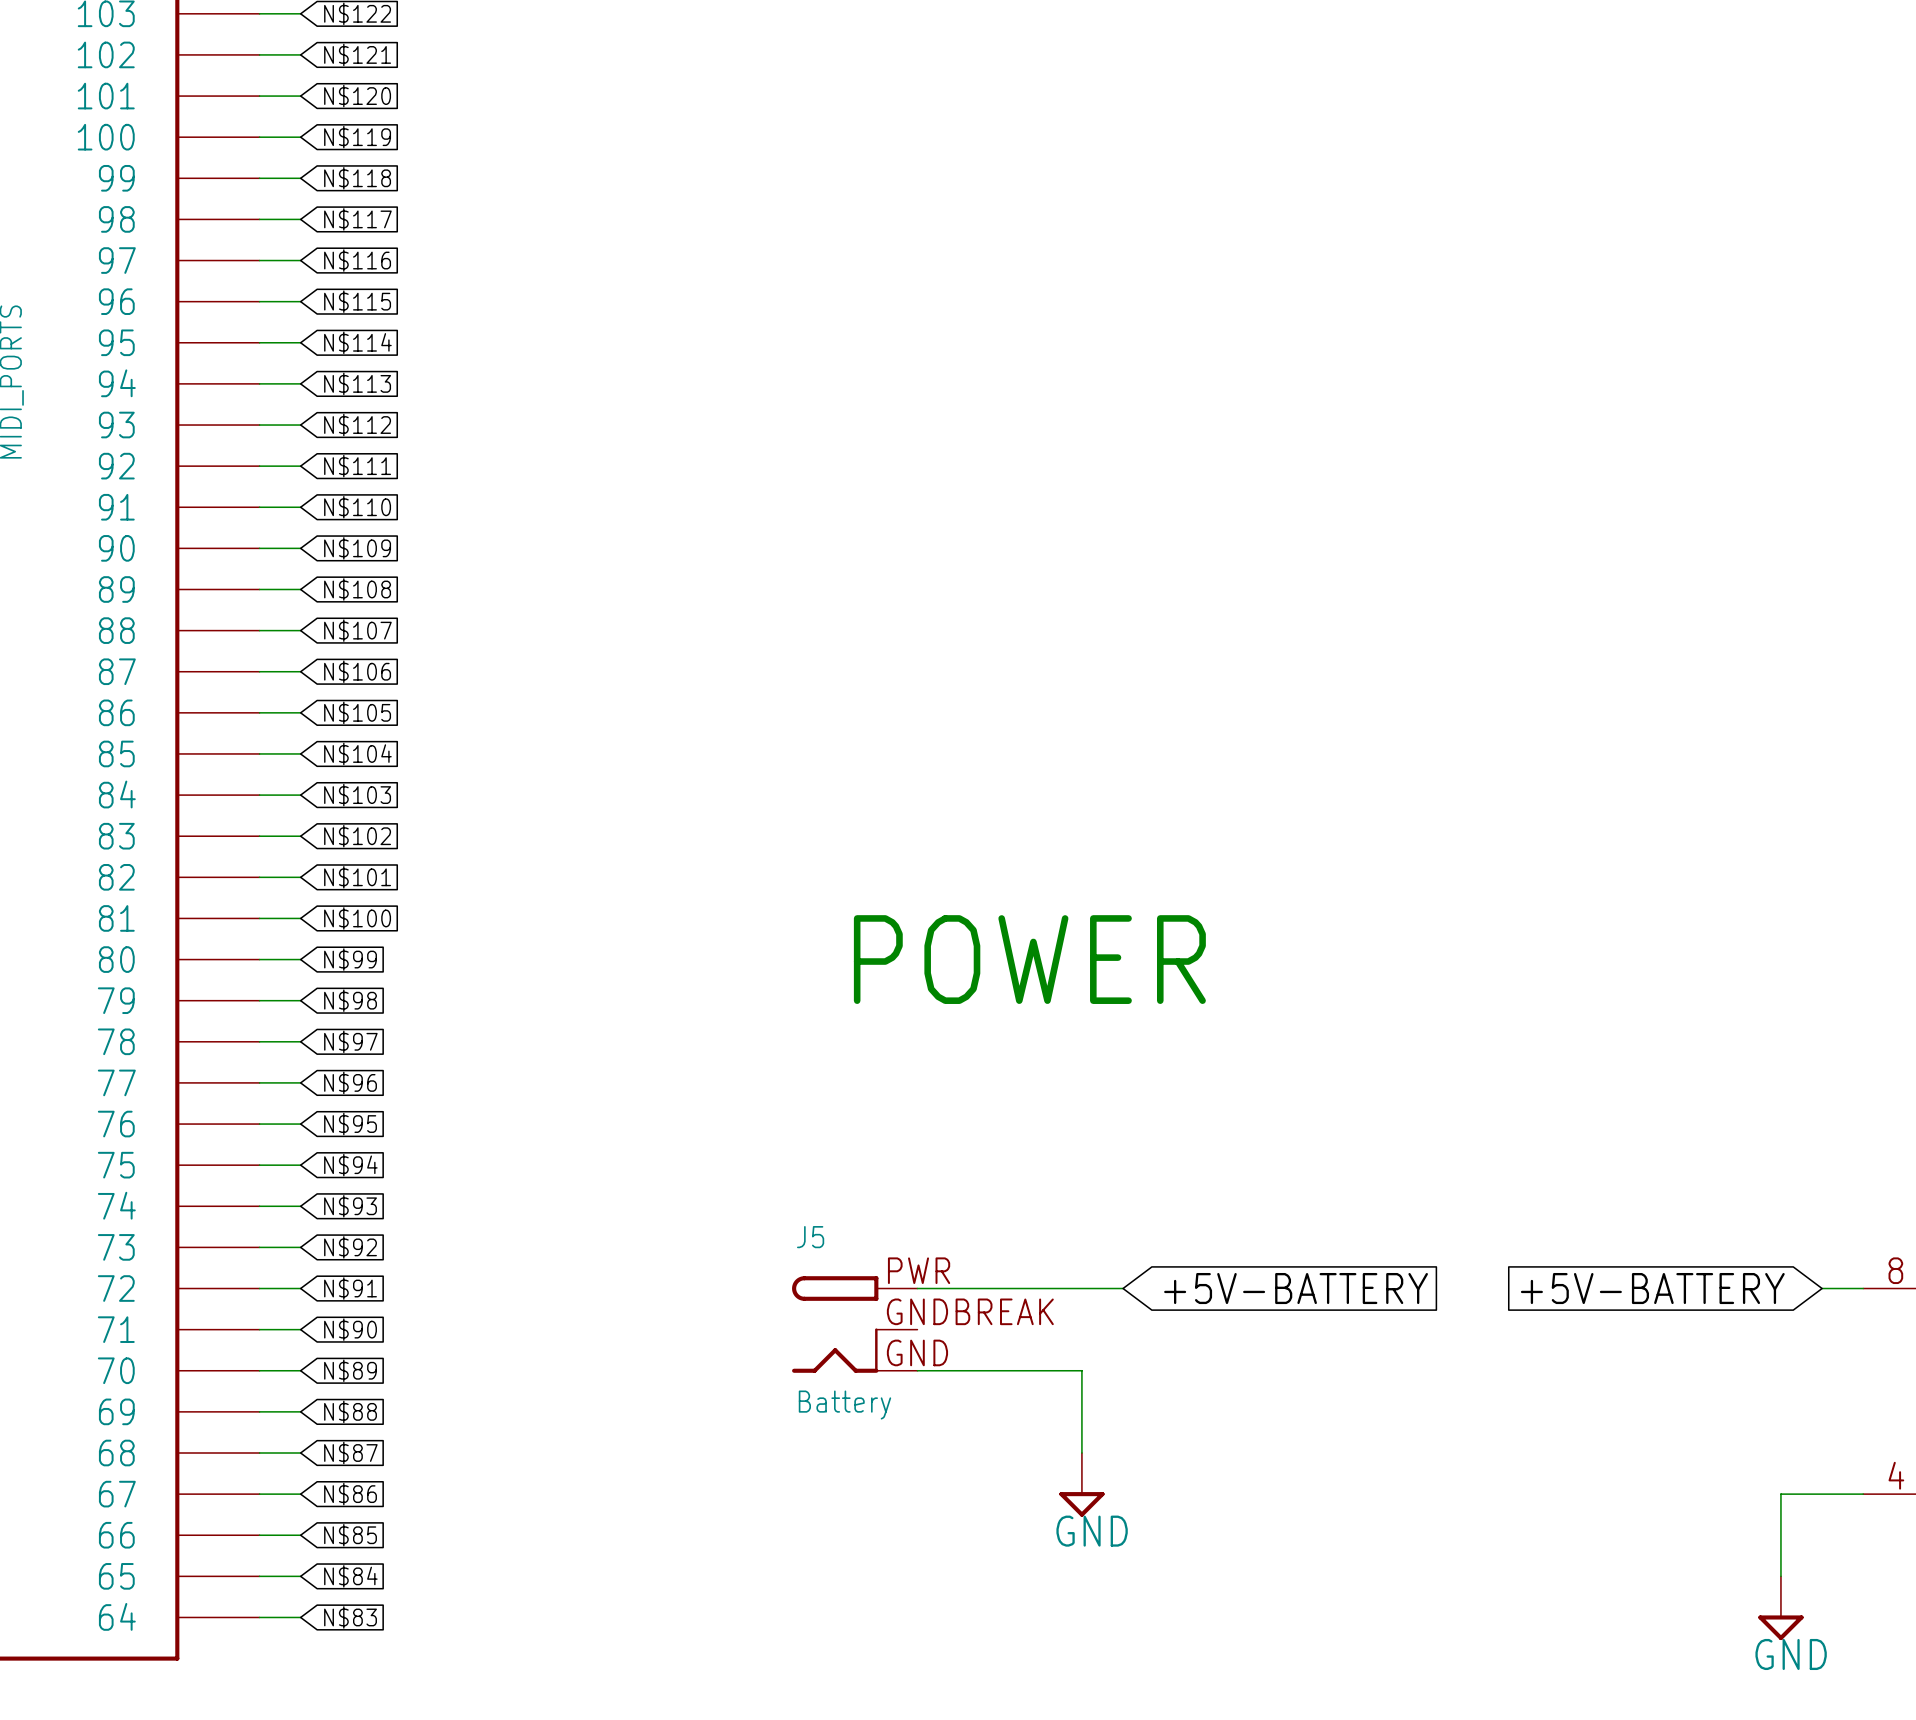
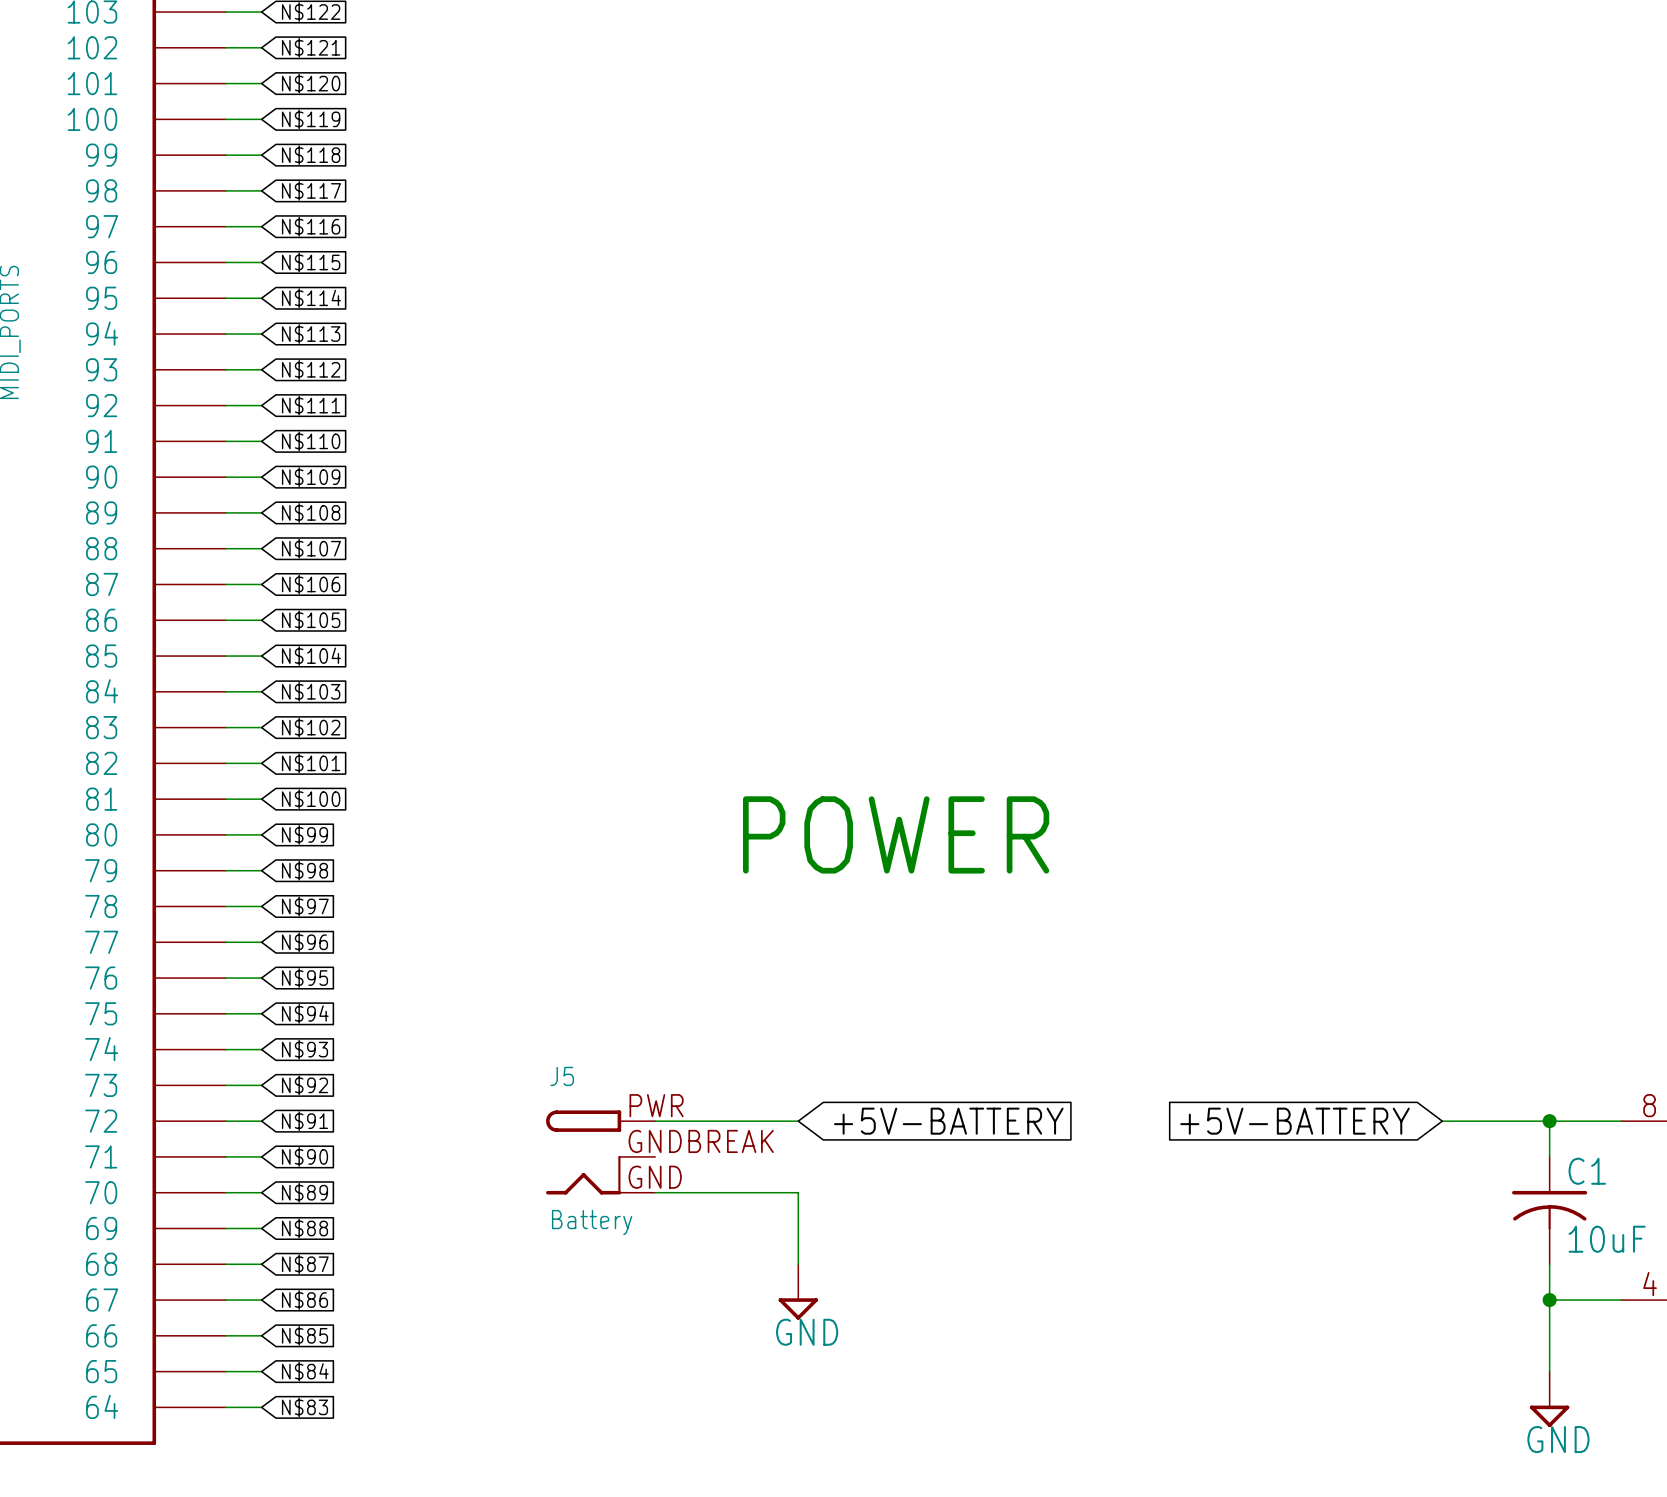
wire: (917, 1288) (1123, 1288) -> (798, 1121) (655, 1121)
global label position: +5V-BATTERY (1296, 1288) -> +5V-BATTERY (948, 1121)
global label position: +5V-BATTERY (1652, 1288) -> +5V-BATTERY (1295, 1121)
wire: none -> (1442, 1121) (1585, 1121)
wire: none -> (1549, 1121) (1549, 1156)
junction: none -> (1549, 1121)
J5 position: (854, 1324) -> (600, 1152)
wire: (917, 1370) (1081, 1370) (1081, 1453) -> (655, 1192) (798, 1192) (798, 1264)
C1: none -> 10uF (1549, 1210)
wire: none -> (1549, 1264) (1549, 1300)
power symbol position: GND (1081, 1484) -> GND (798, 1292)
junction: none -> (1549, 1300)

